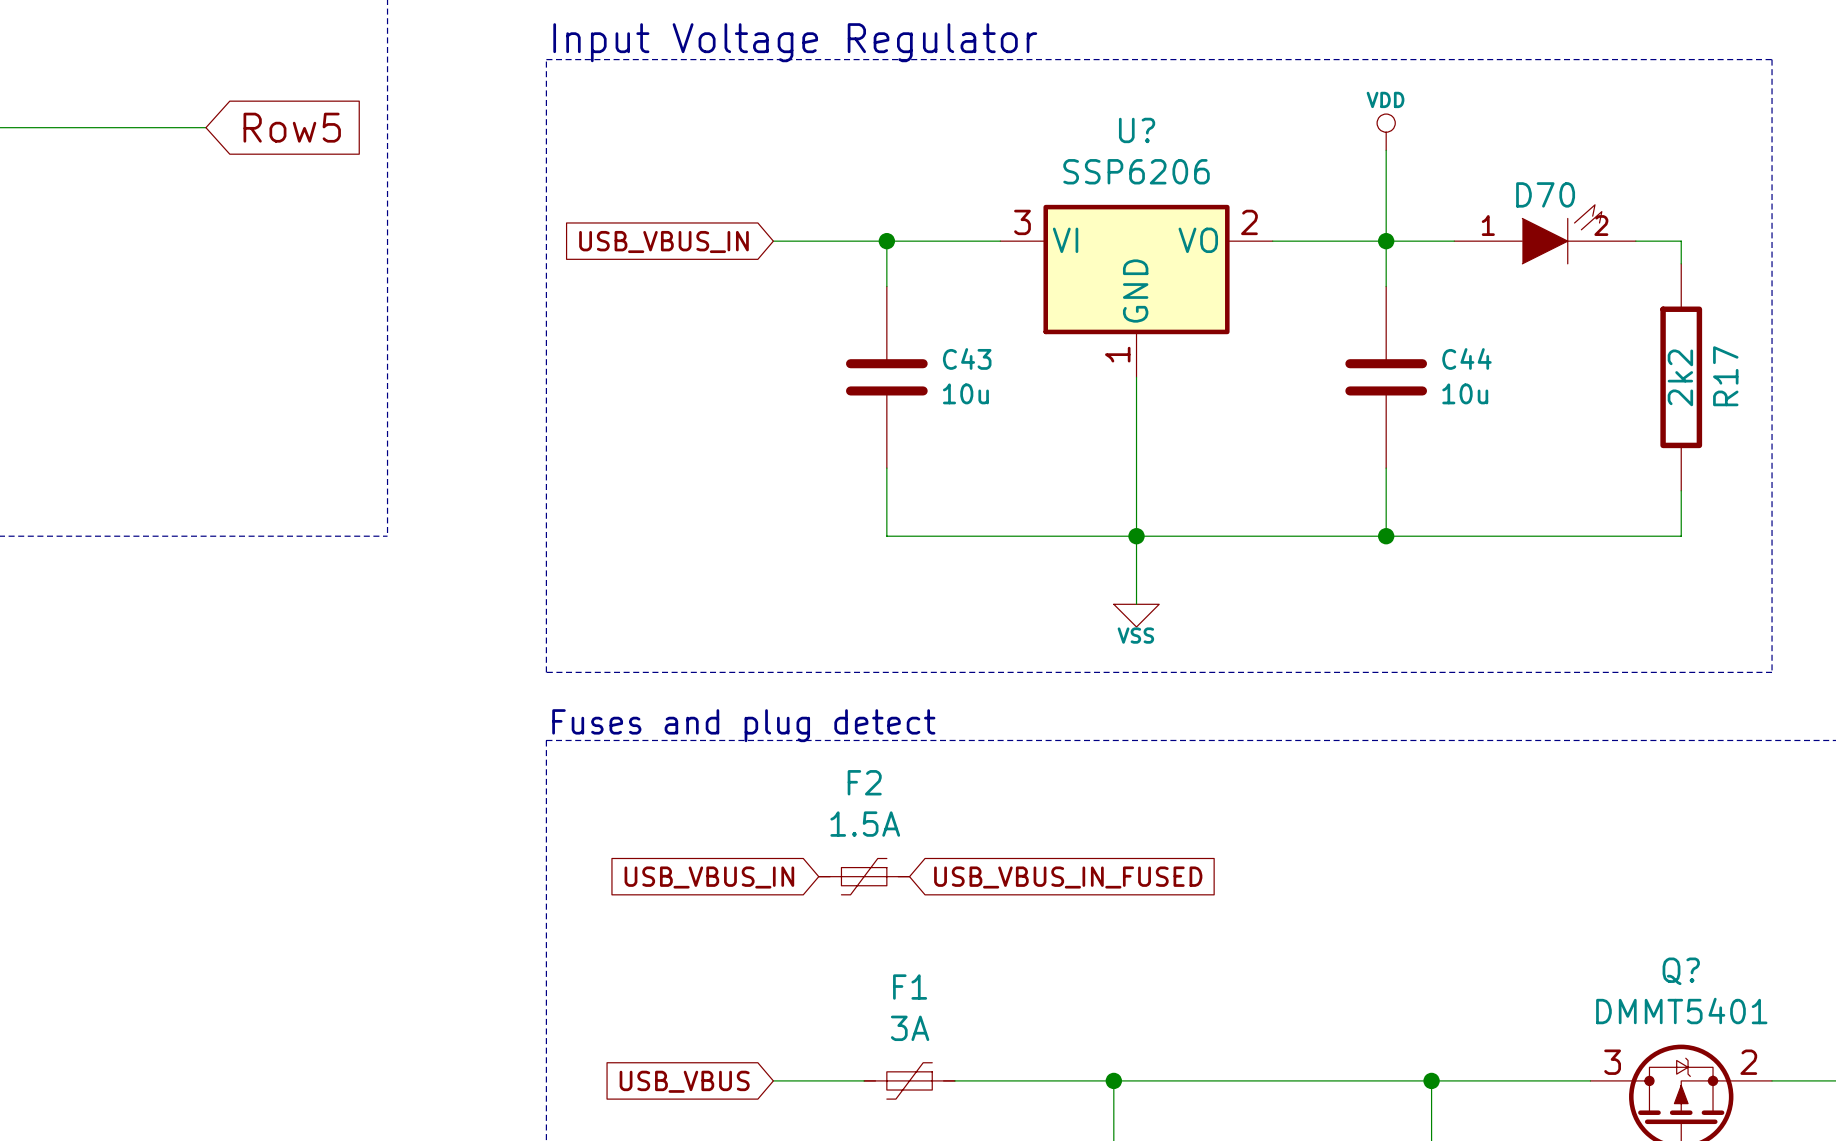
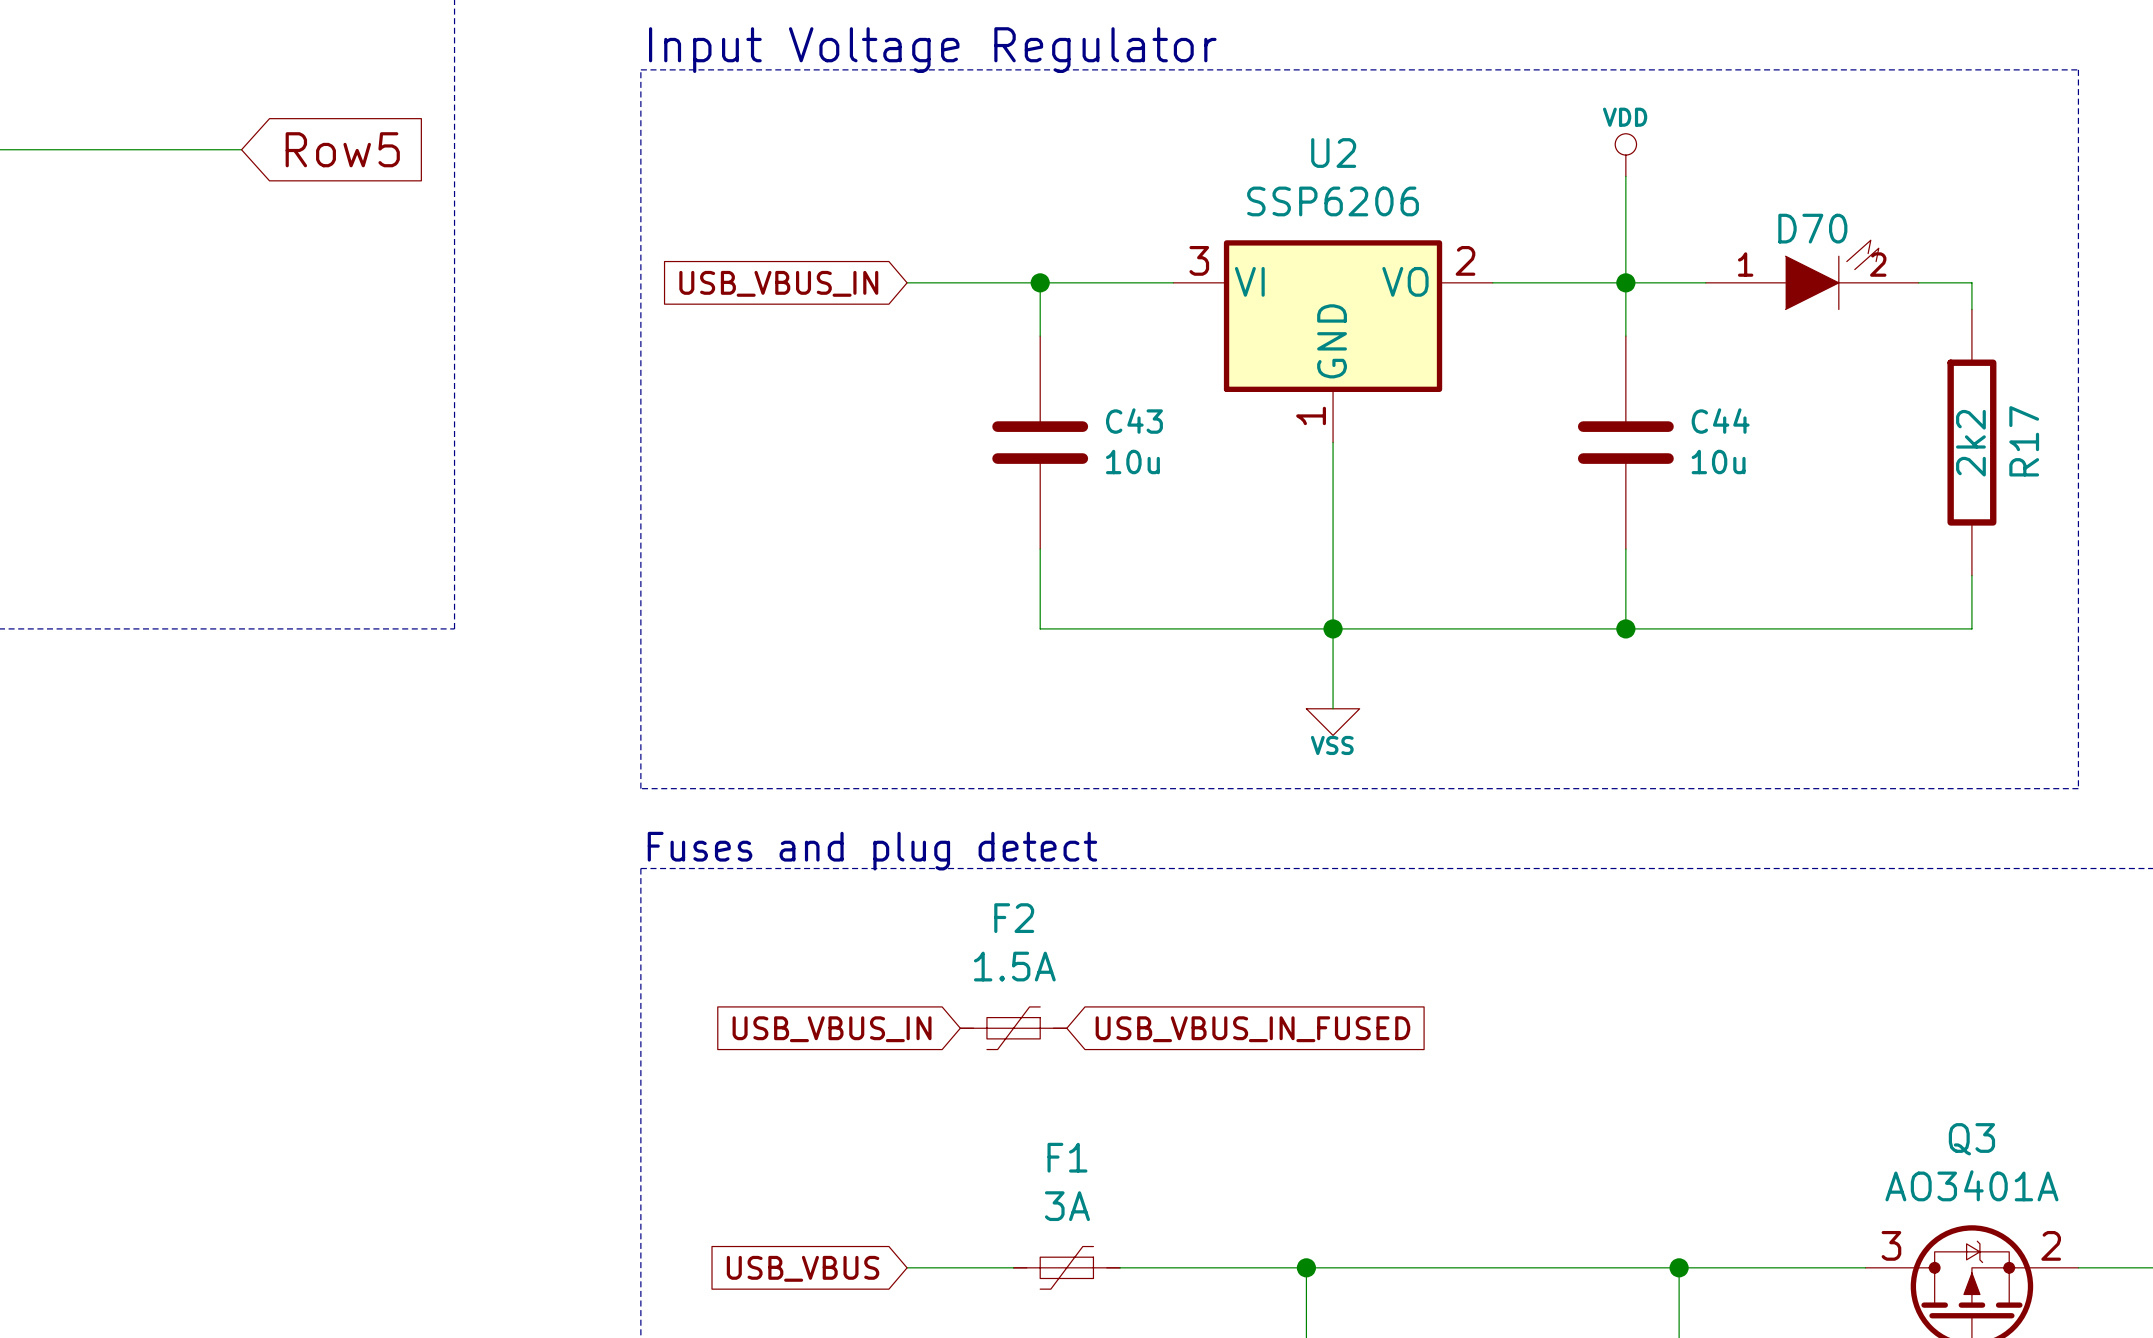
U? name: U? (1137, 130) -> U2 (1333, 153)
Q? name: Q? (1681, 971) -> Q3 (1971, 1139)
Q? value: DMMT5401 (1681, 1011) -> AO3401A (1971, 1185)

